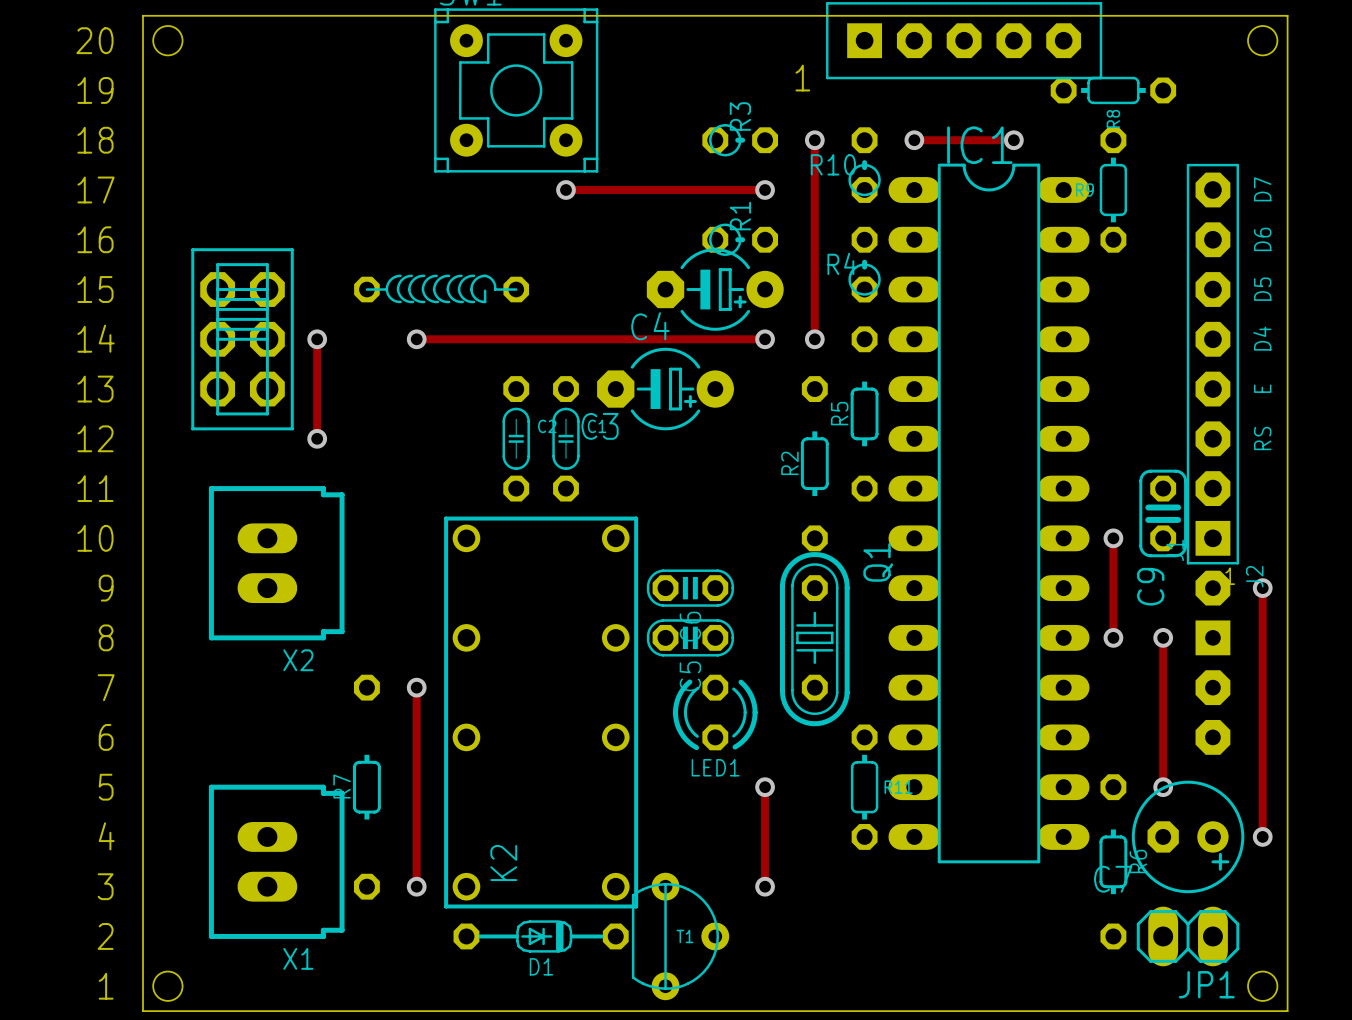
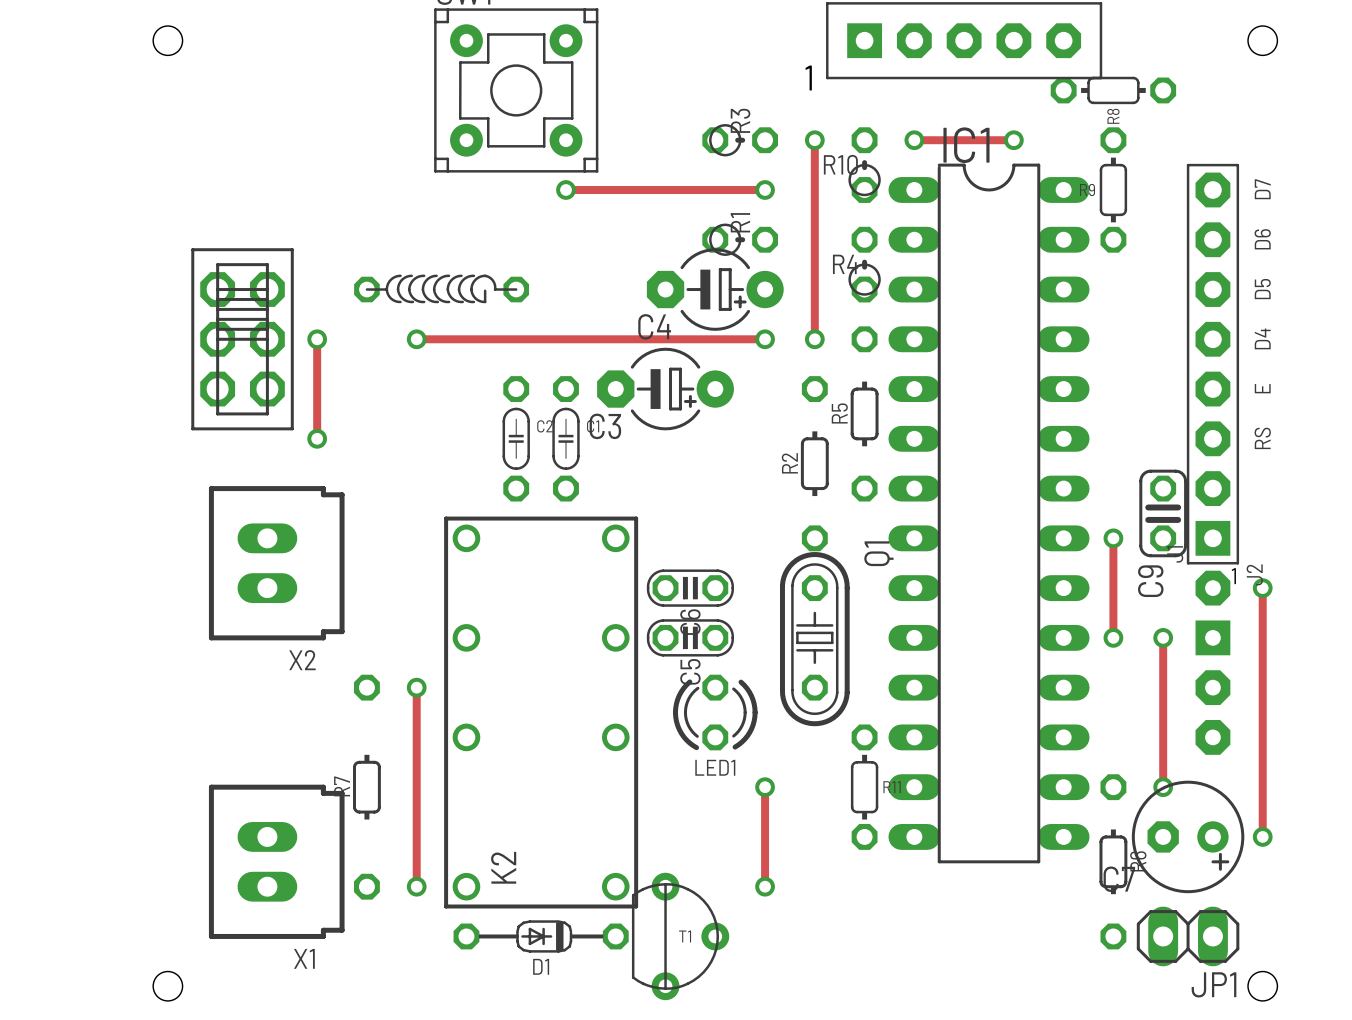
board edge: (142, 15) (1287, 15) (1287, 1011) (142, 1011) (142, 15) -> none
text: 20 (94, 40) -> none
text: 19 (95, 90) -> none
text: 18 (95, 140) -> none
text: 17 (96, 189) -> none
text: 16 (95, 239) -> none
text: 15 (95, 289) -> none
text: 14 (96, 338) -> none
text: 13 (95, 389) -> none
text: 12 (95, 438) -> none
text: 11 (95, 488) -> none
text: 10 (95, 538) -> none
text: 9 (106, 588) -> none
text: 8 (106, 637) -> none
text: 7 (106, 687) -> none
text: 6 (106, 737) -> none
text: 5 (106, 787) -> none
text: 4 (106, 836) -> none
text: 3 (105, 886) -> none
text: 2 (105, 936) -> none
text: 1 (106, 986) -> none

